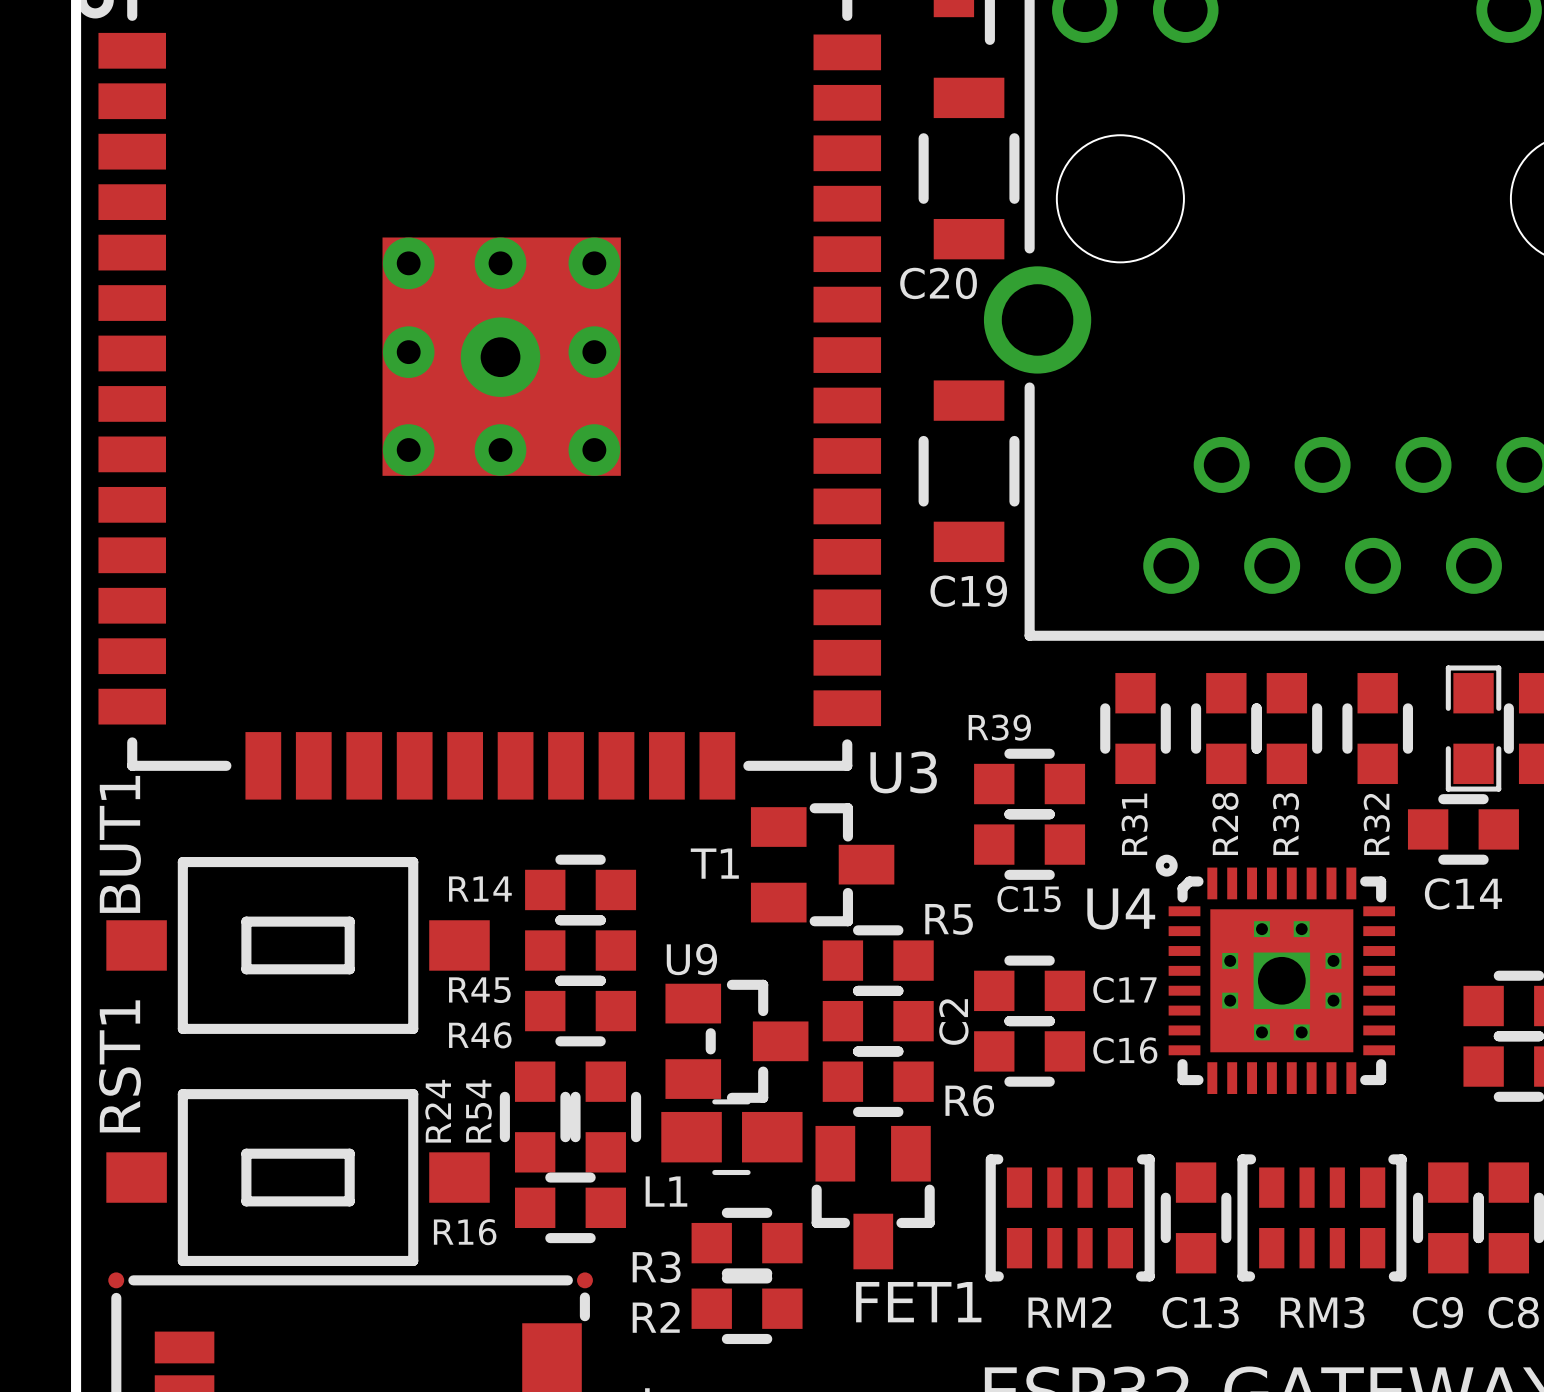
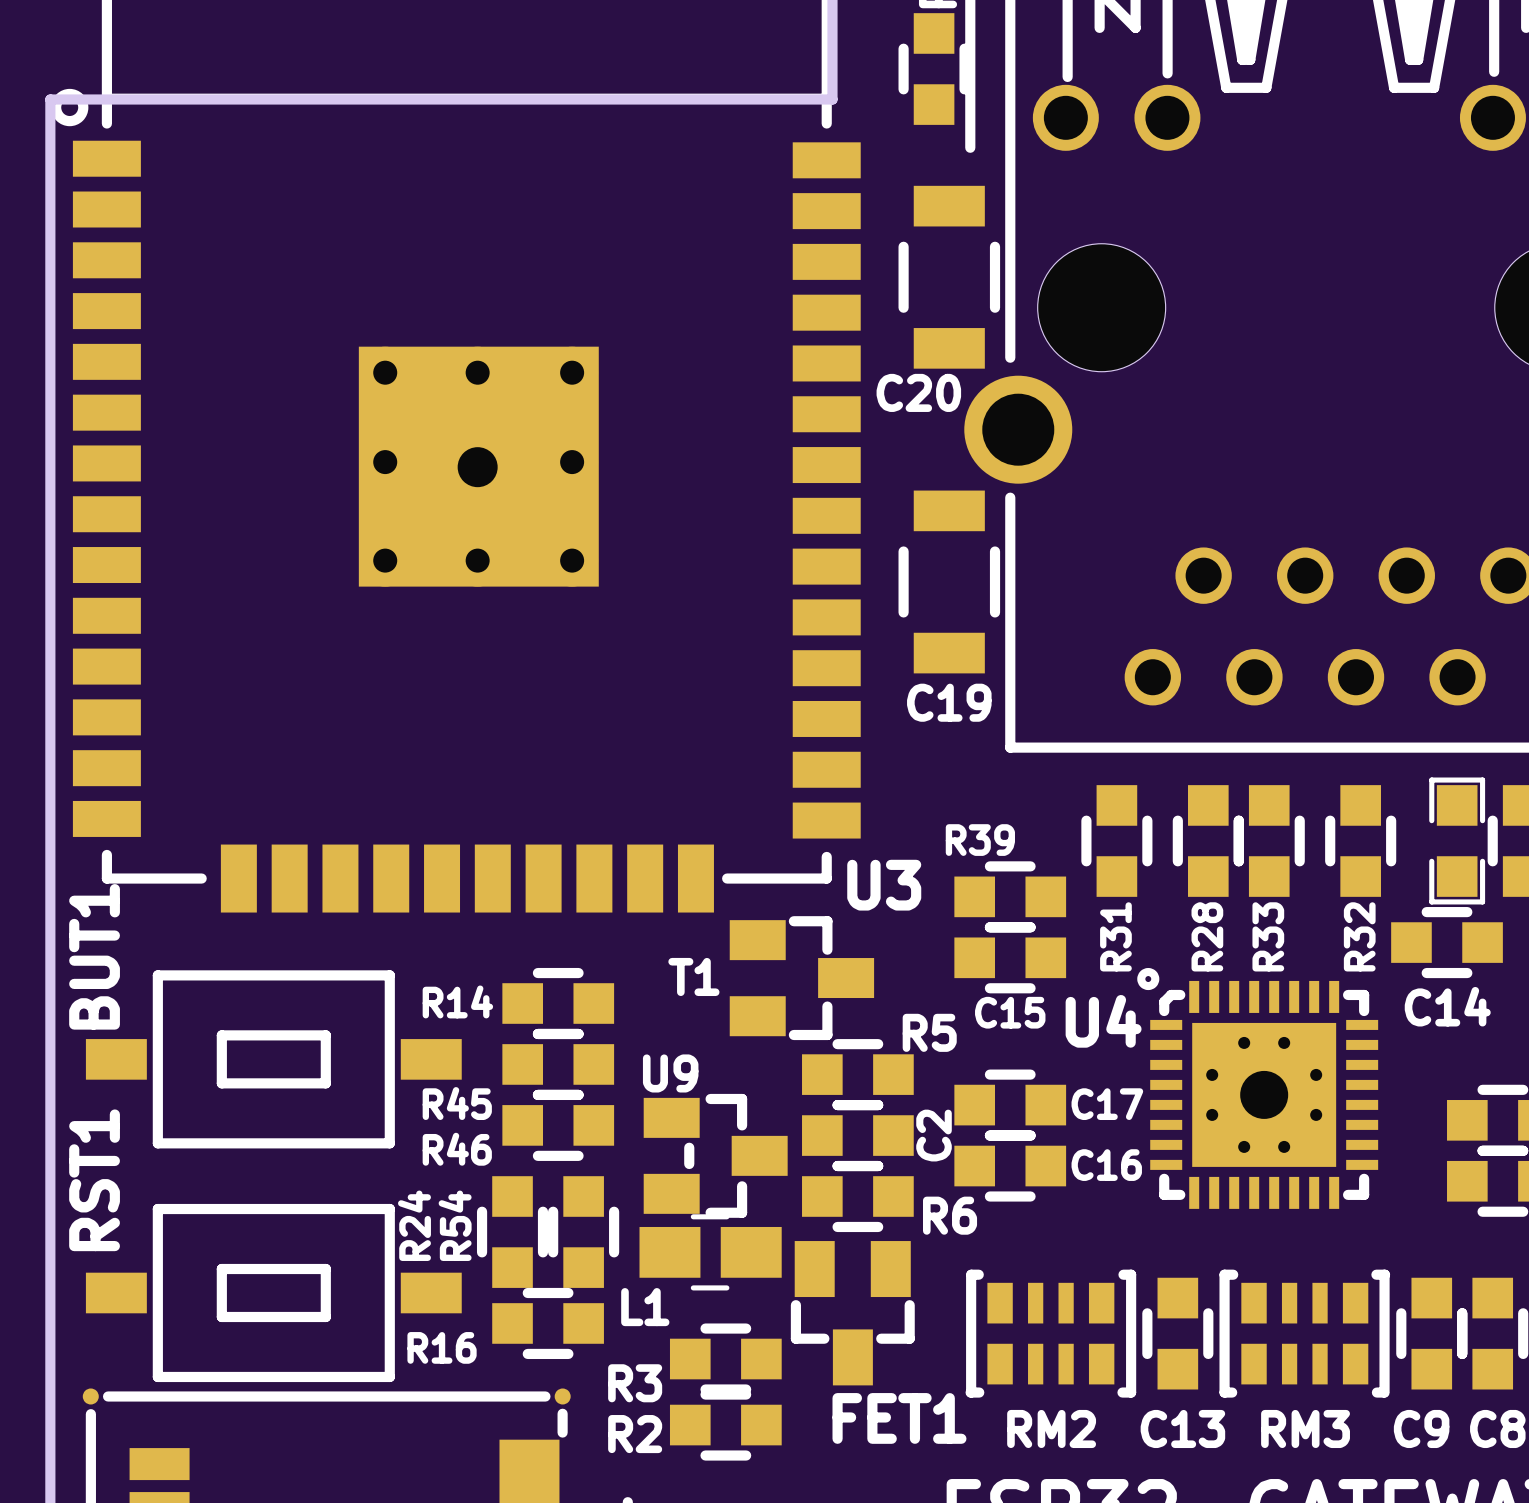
BUT1 footprint: [106, 857, 490, 1034] -> [85, 970, 462, 1149]
RST1 footprint: [106, 1089, 490, 1267] -> [85, 1203, 462, 1383]

